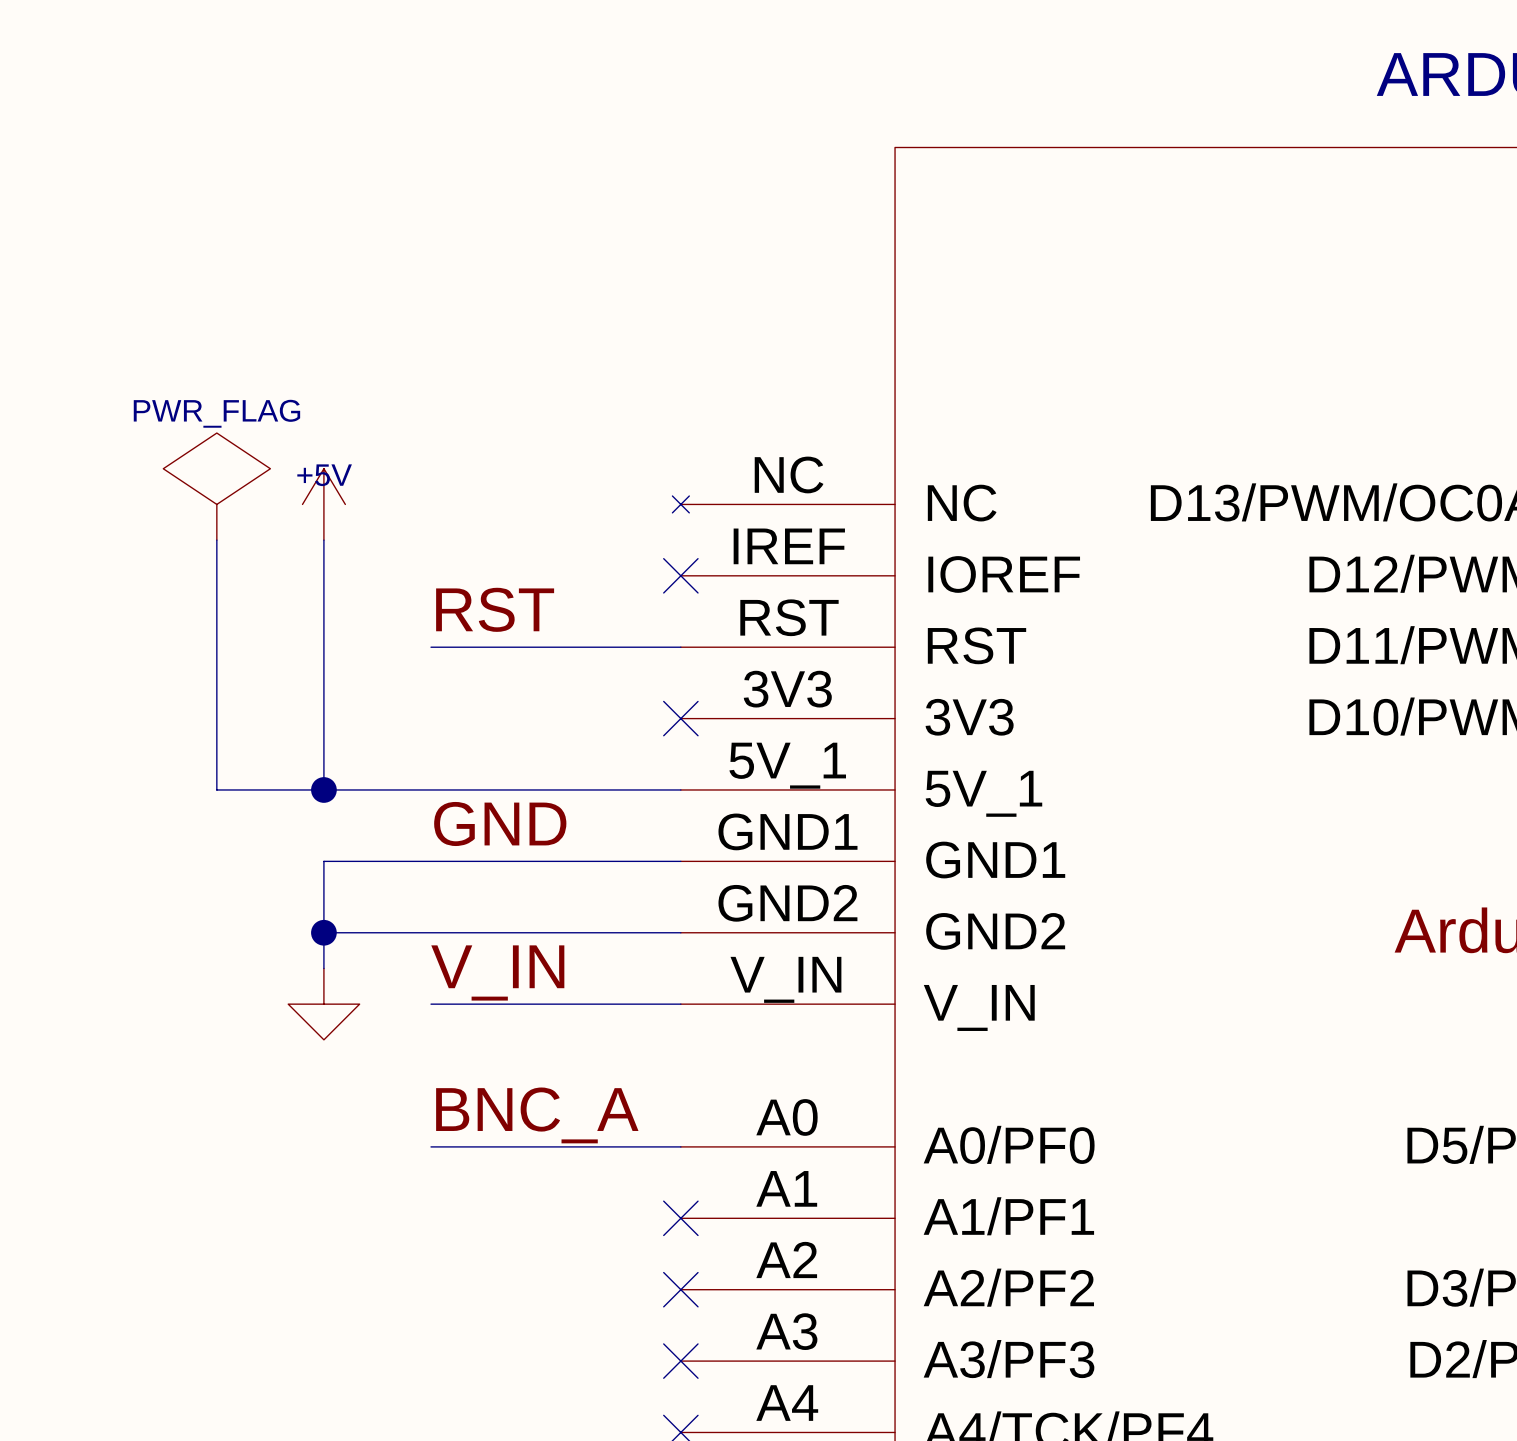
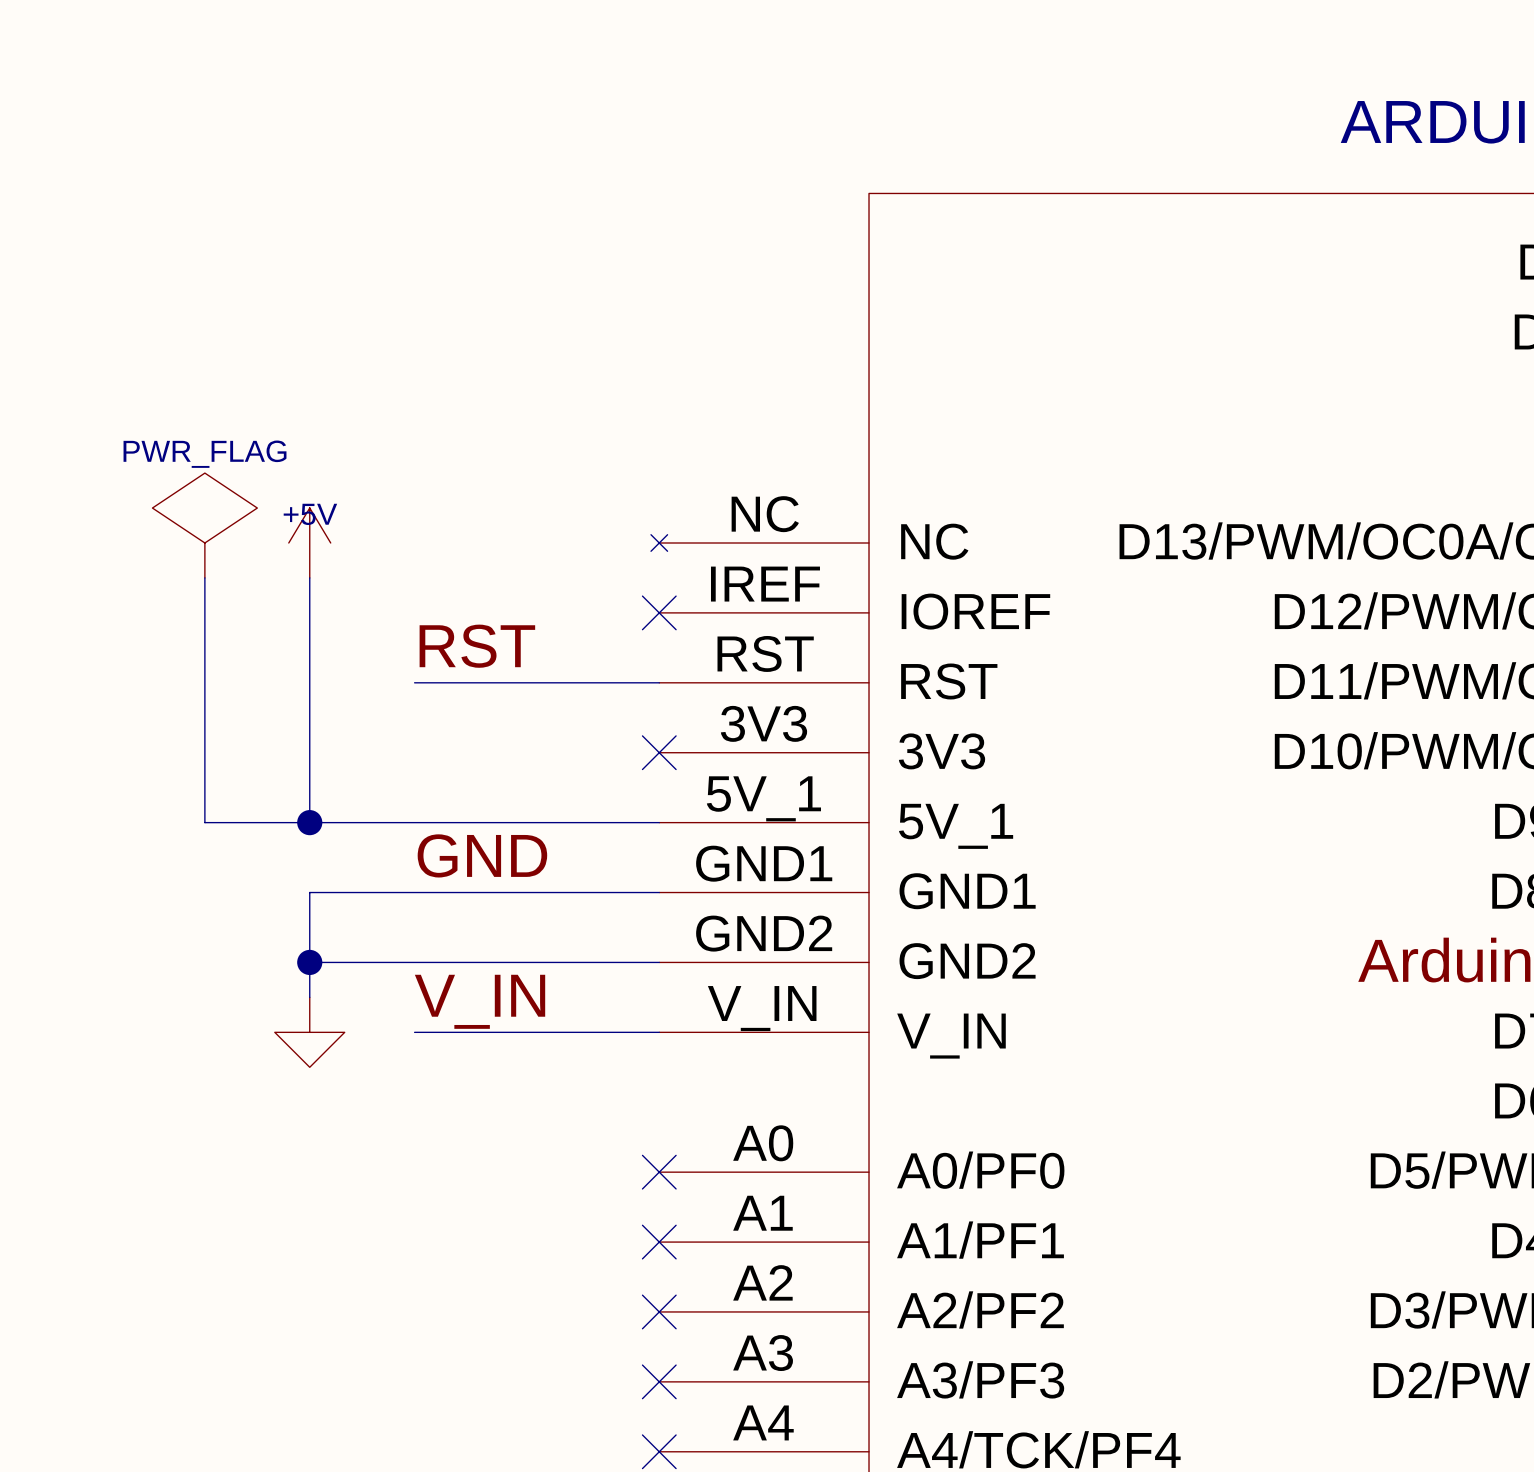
label: BNC_A (537, 1115) -> none
wire: (431, 1146) (680, 1146) -> none
no-connect mark: none -> (659, 1172)

